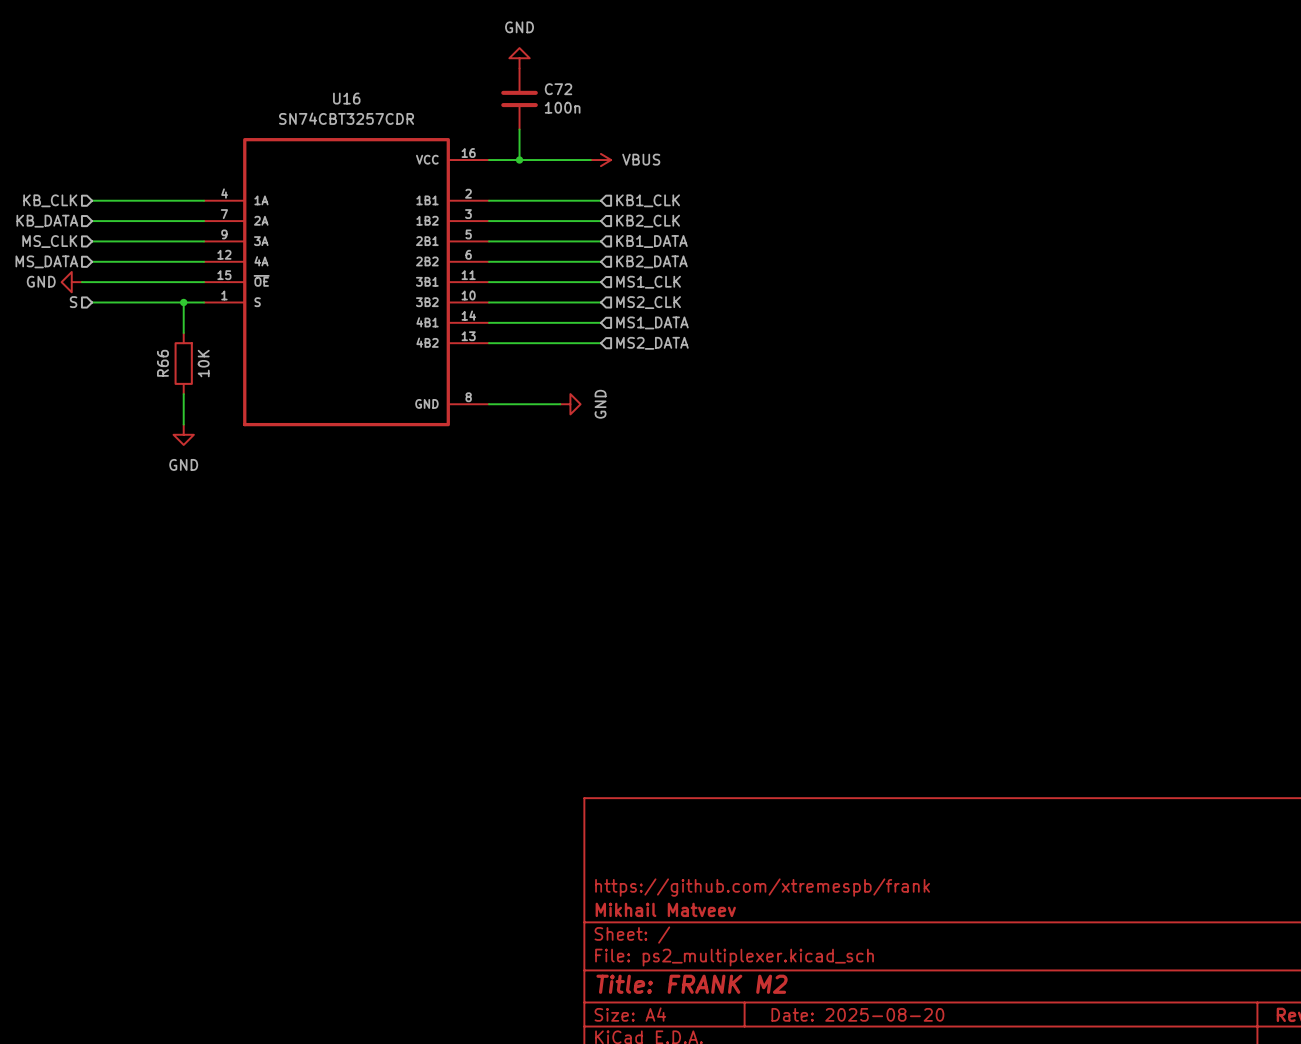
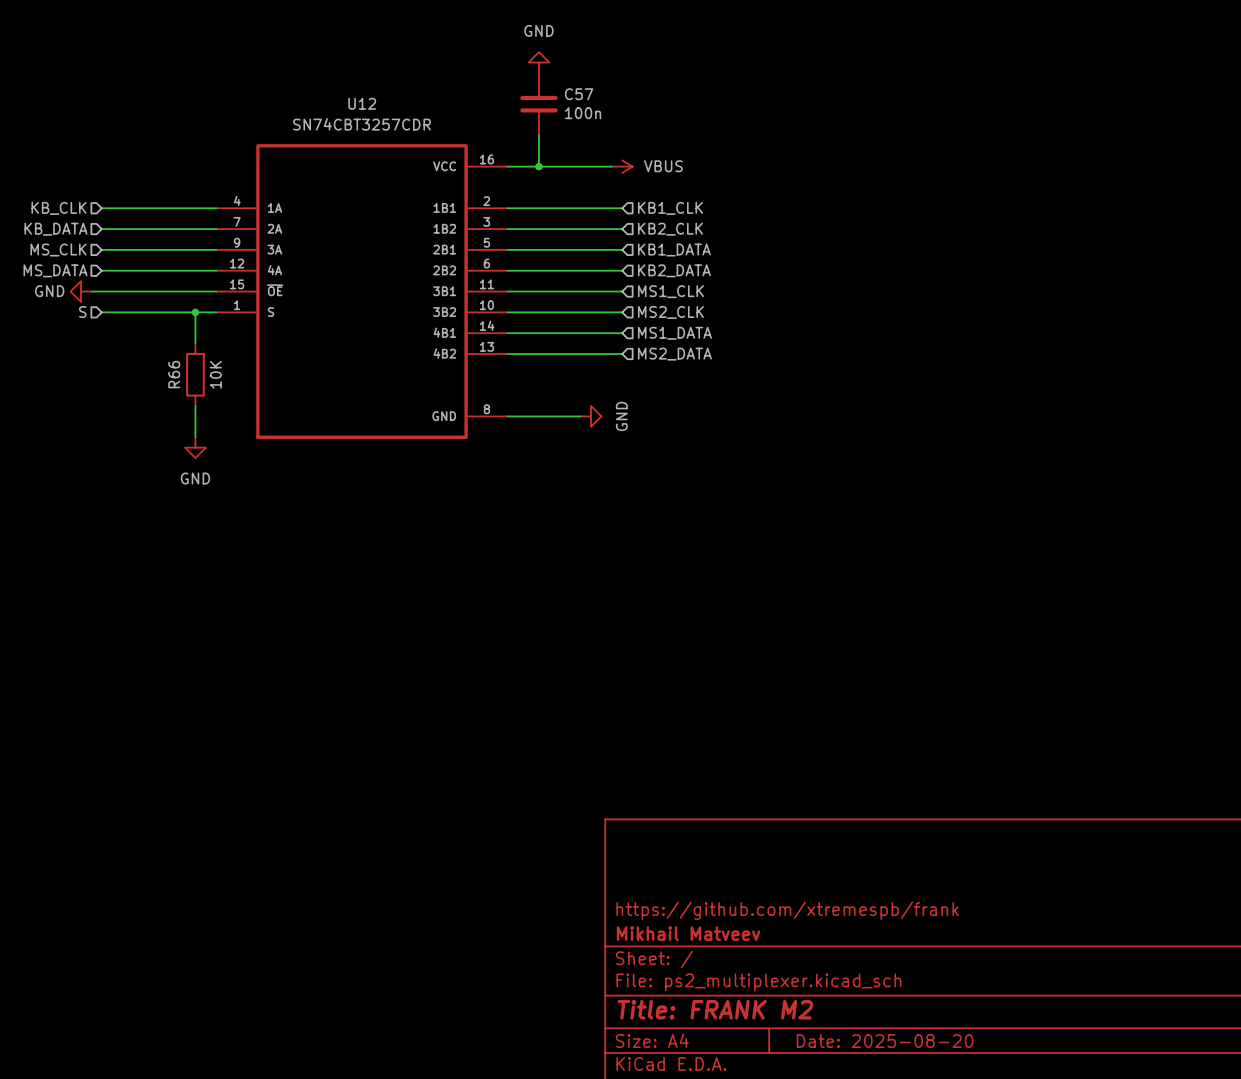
C72 name: C72 (558, 89) -> C57 (579, 94)
U16 name: U16 (346, 98) -> U12 (362, 103)

